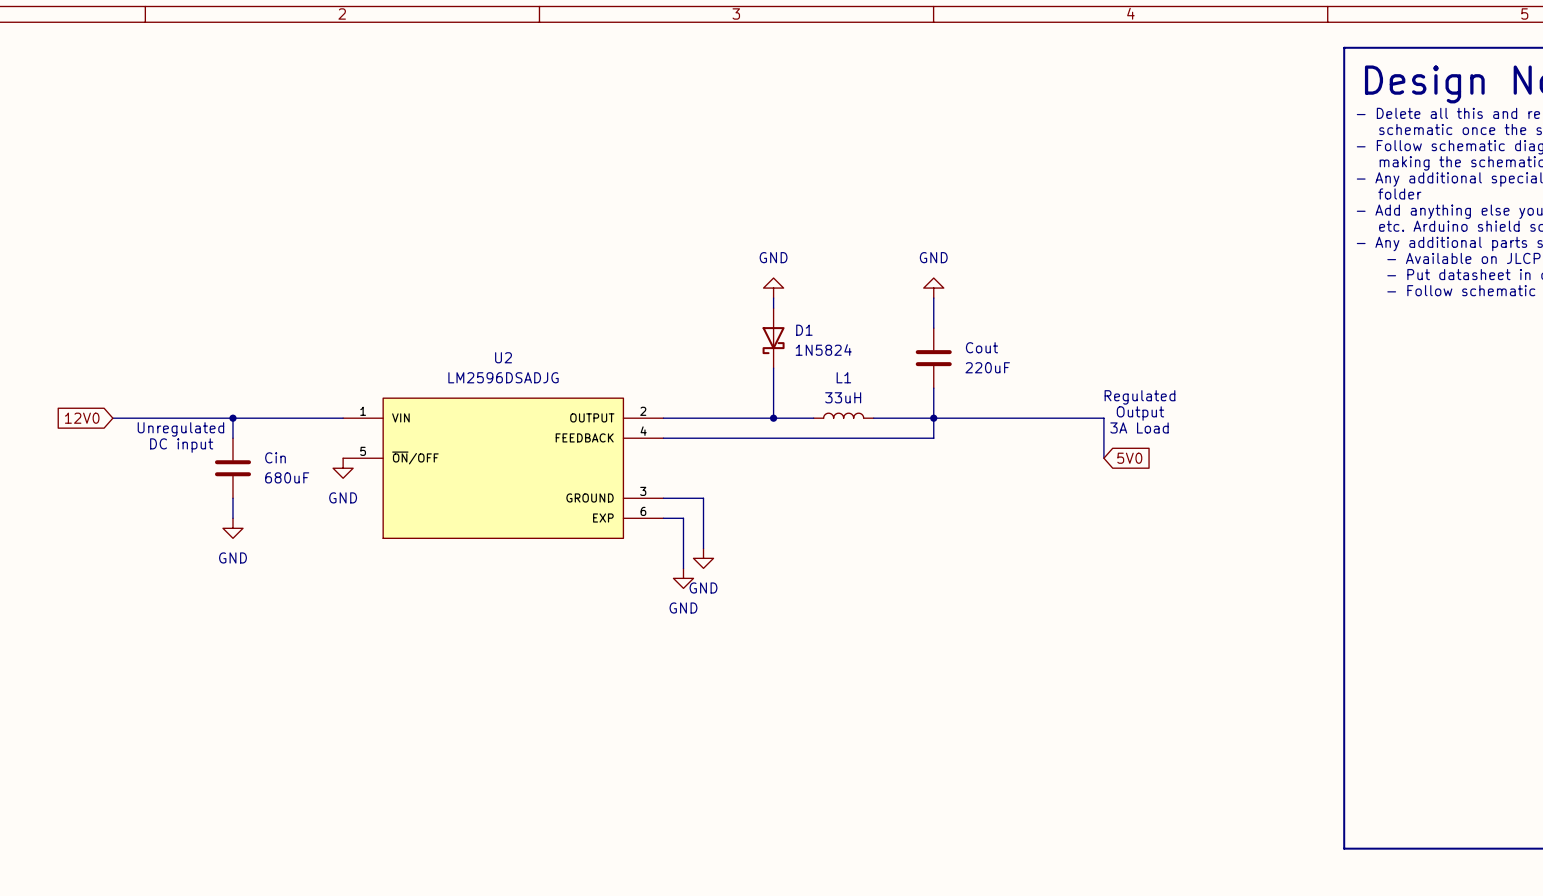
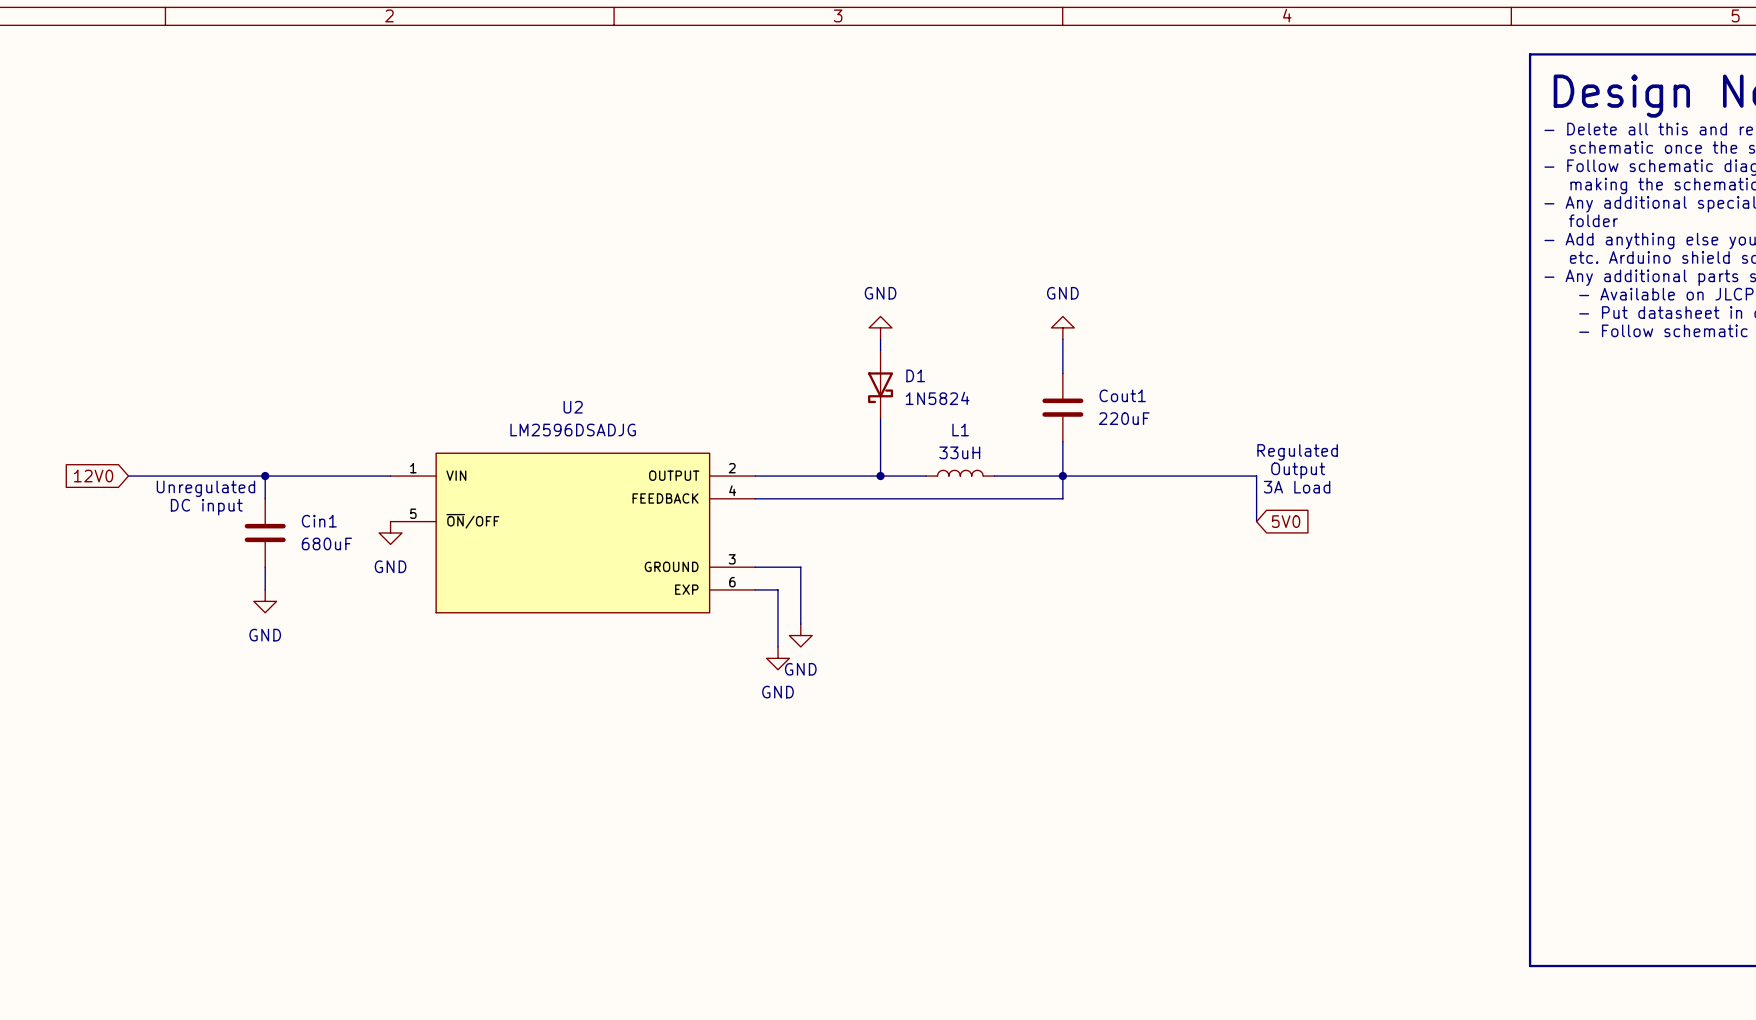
Cout name: Cout (981, 347) -> Cout1 (1122, 395)
Cin name: Cin (275, 457) -> Cin1 (319, 521)

